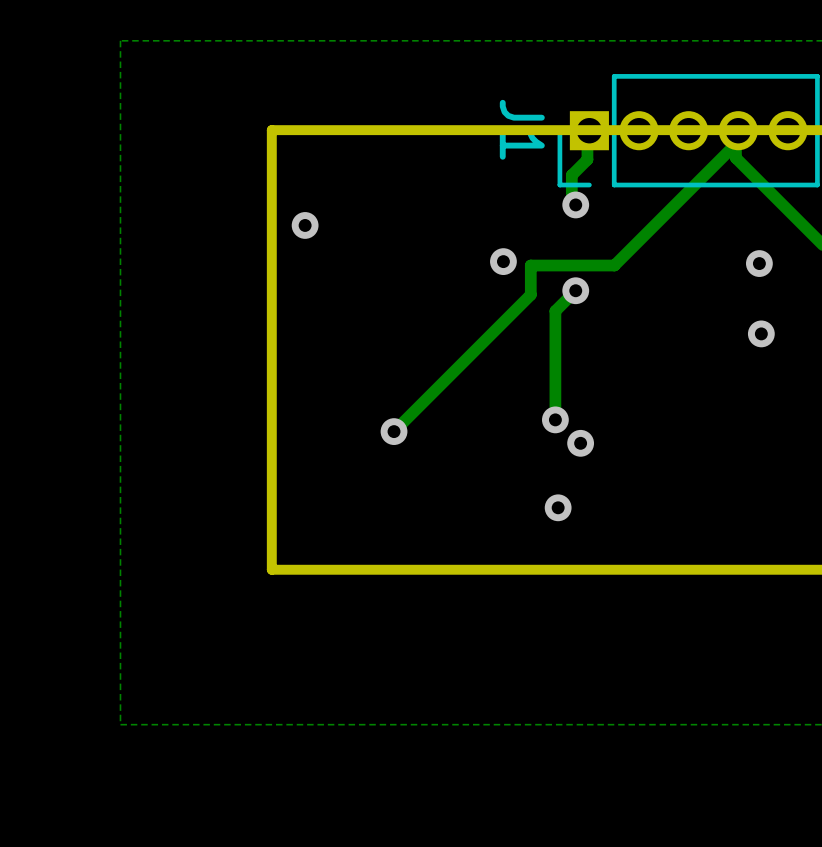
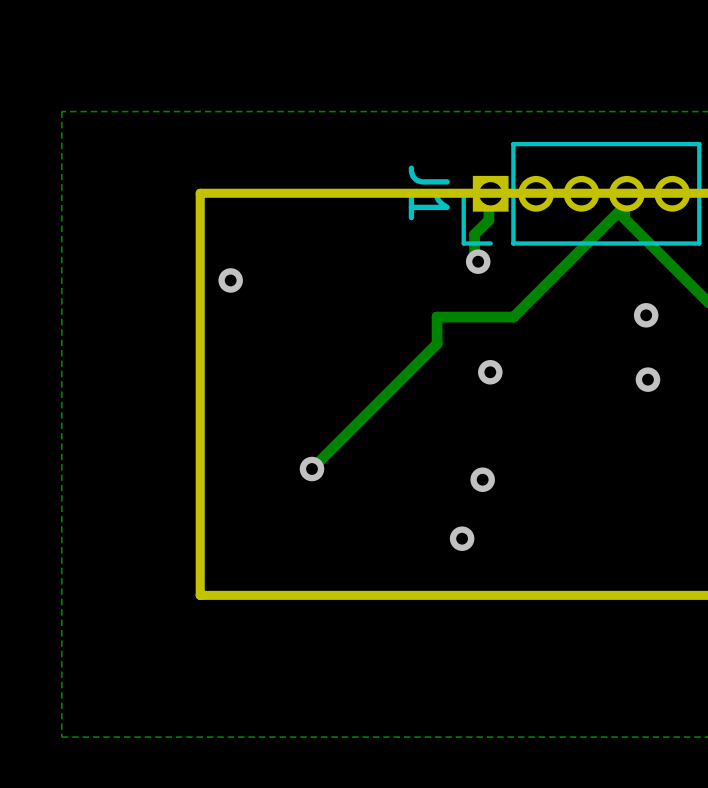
via: (503, 261) -> none
track: (575, 290) (555, 311) (555, 419) -> none
via position: (575, 290) -> (490, 372)
via: (555, 419) -> none

